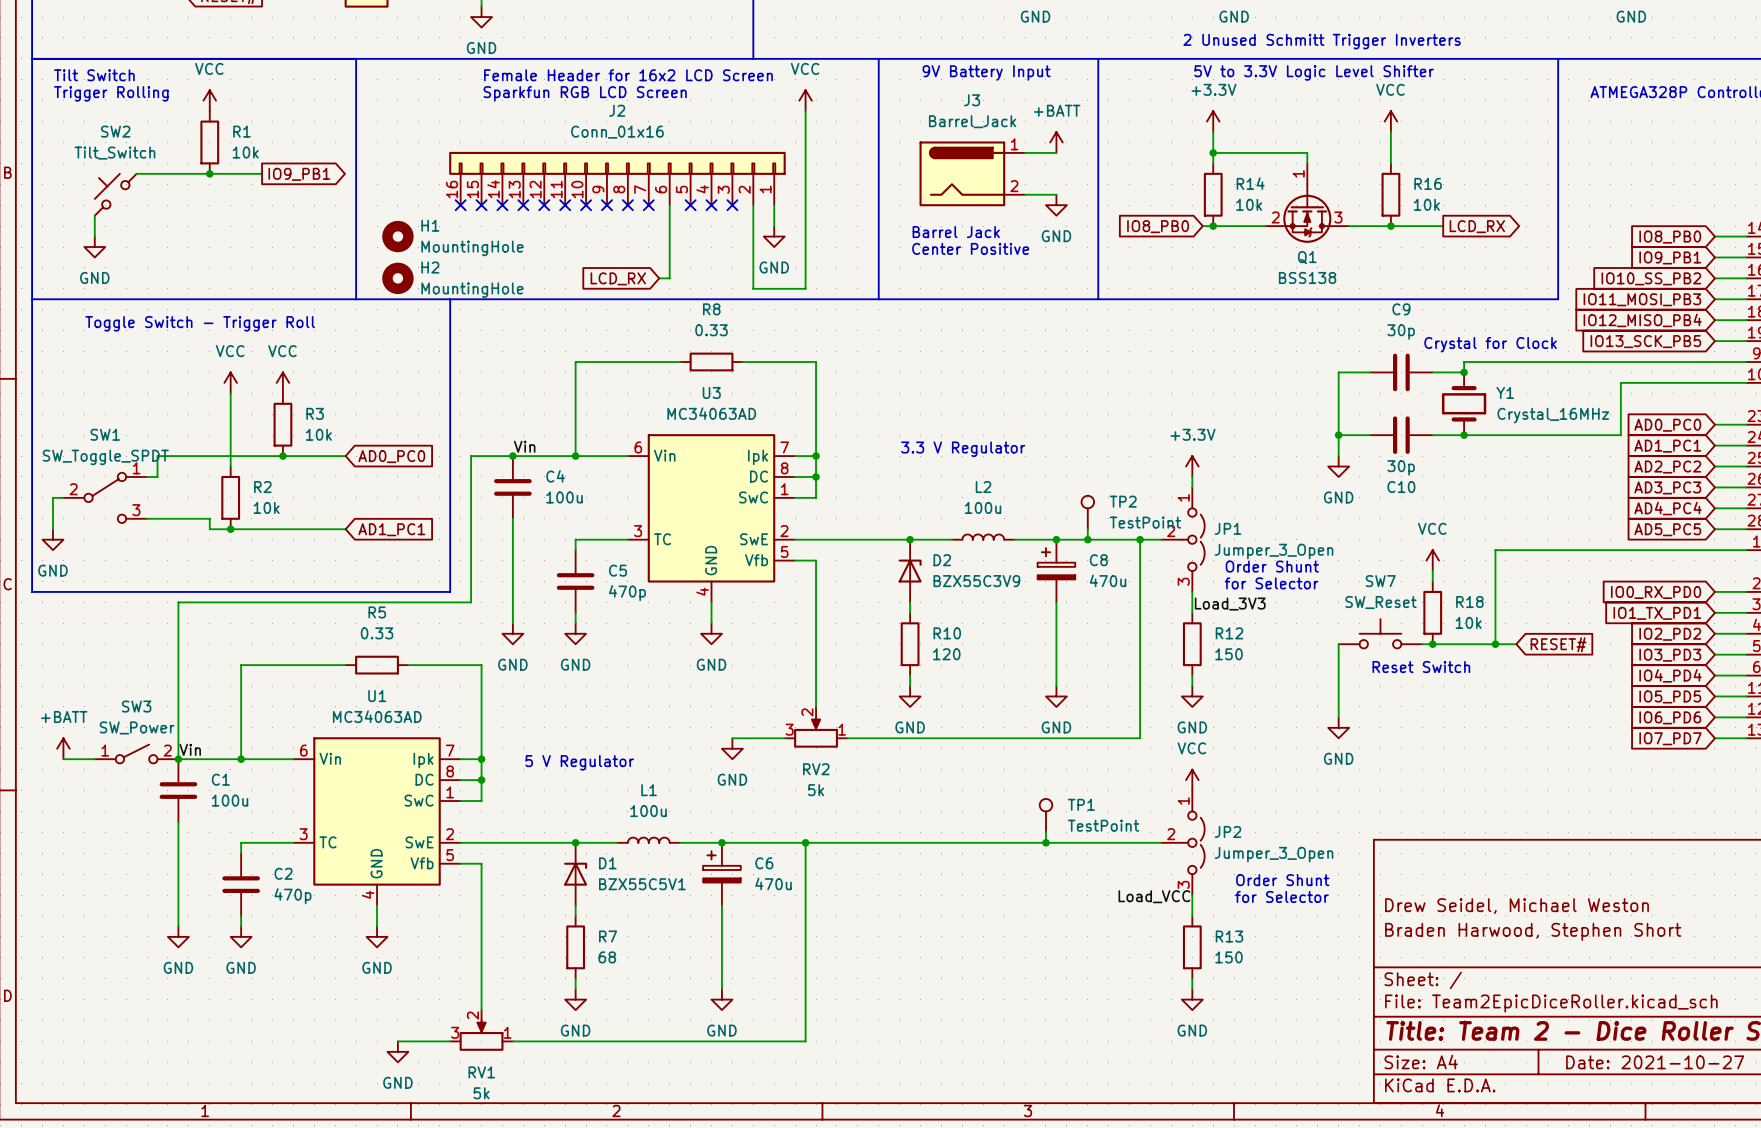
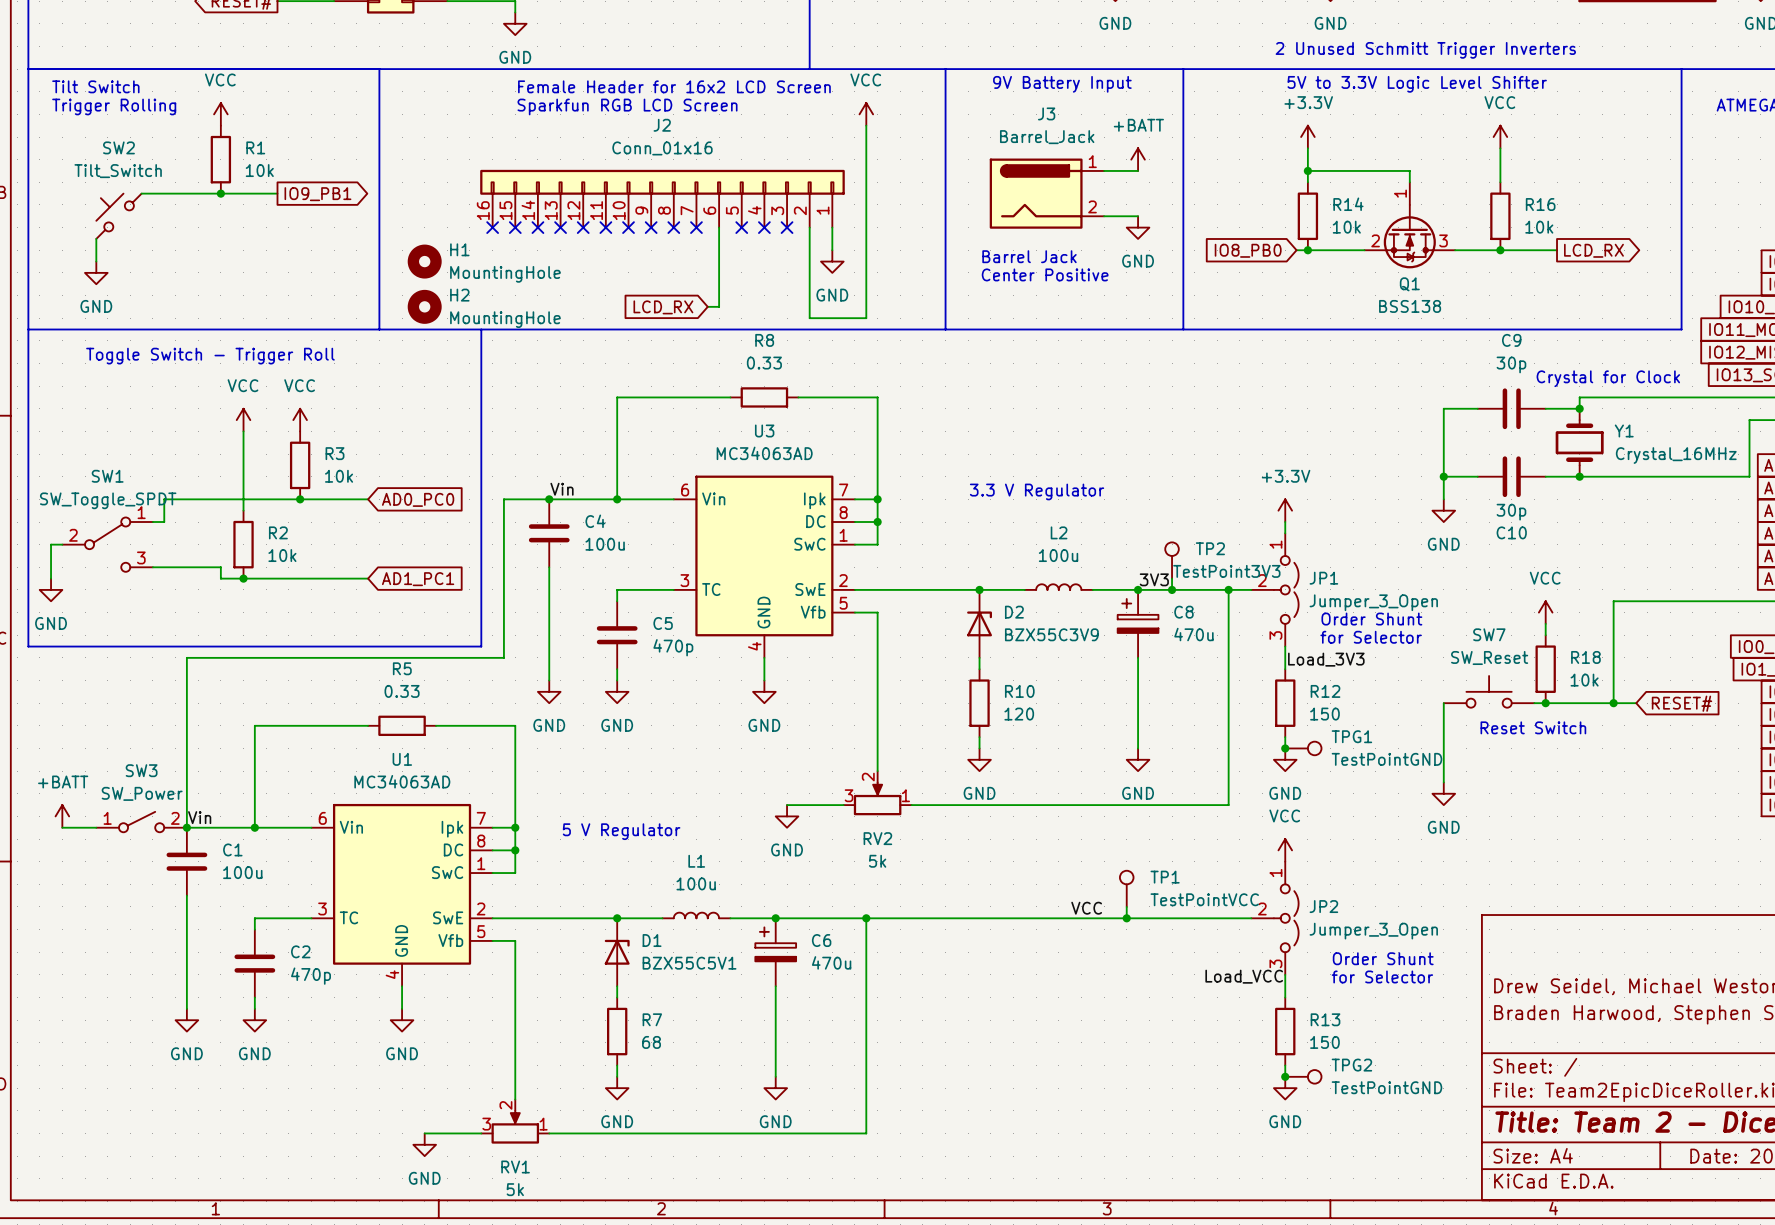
TP2 value: TestPoint (1145, 522) -> TestPoint3V3 (1226, 571)
label: none -> 3V3 (1154, 579)
junction: none -> (1285, 748)
TPG1: none -> TestPointGND (1303, 748)
TP1 value: TestPoint (1103, 825) -> TestPointVCC (1204, 899)
label: none -> VCC (1086, 908)
junction: none -> (1285, 1076)
TPG2: none -> TestPointGND (1303, 1076)

